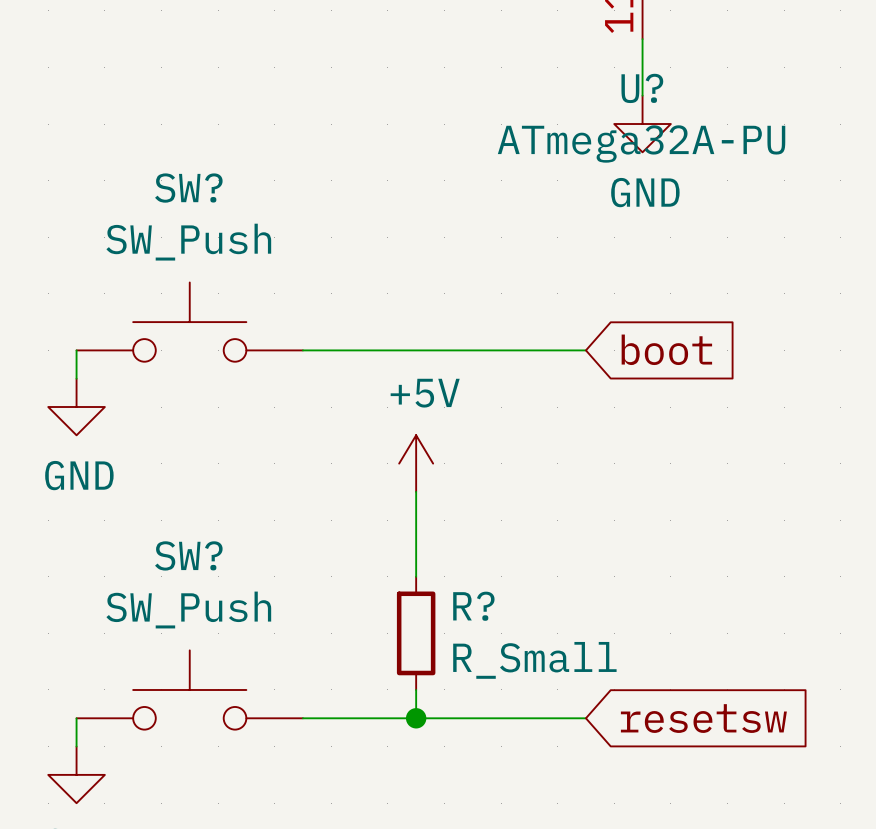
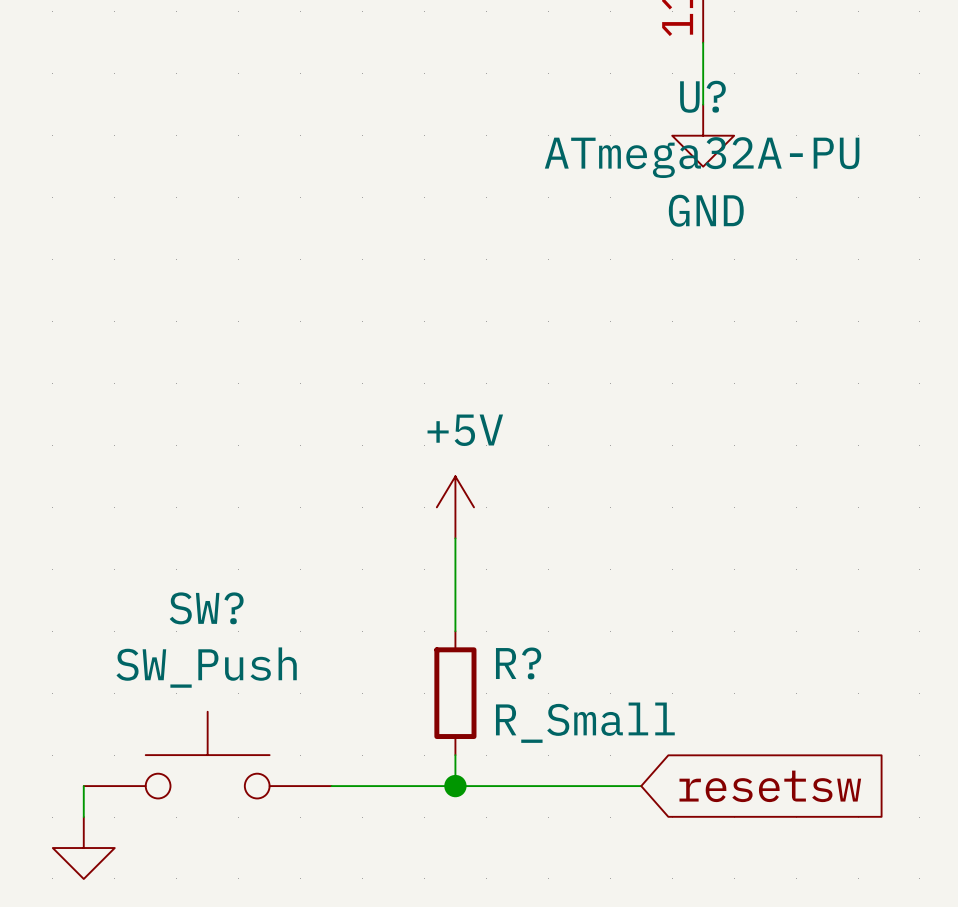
SW?: SW_Push (189, 322) -> none
global label: boot (666, 349) -> none
wire: (76, 350) (76, 378) -> none
wire: (302, 350) (585, 350) -> none
power symbol: GND (76, 407) -> none

